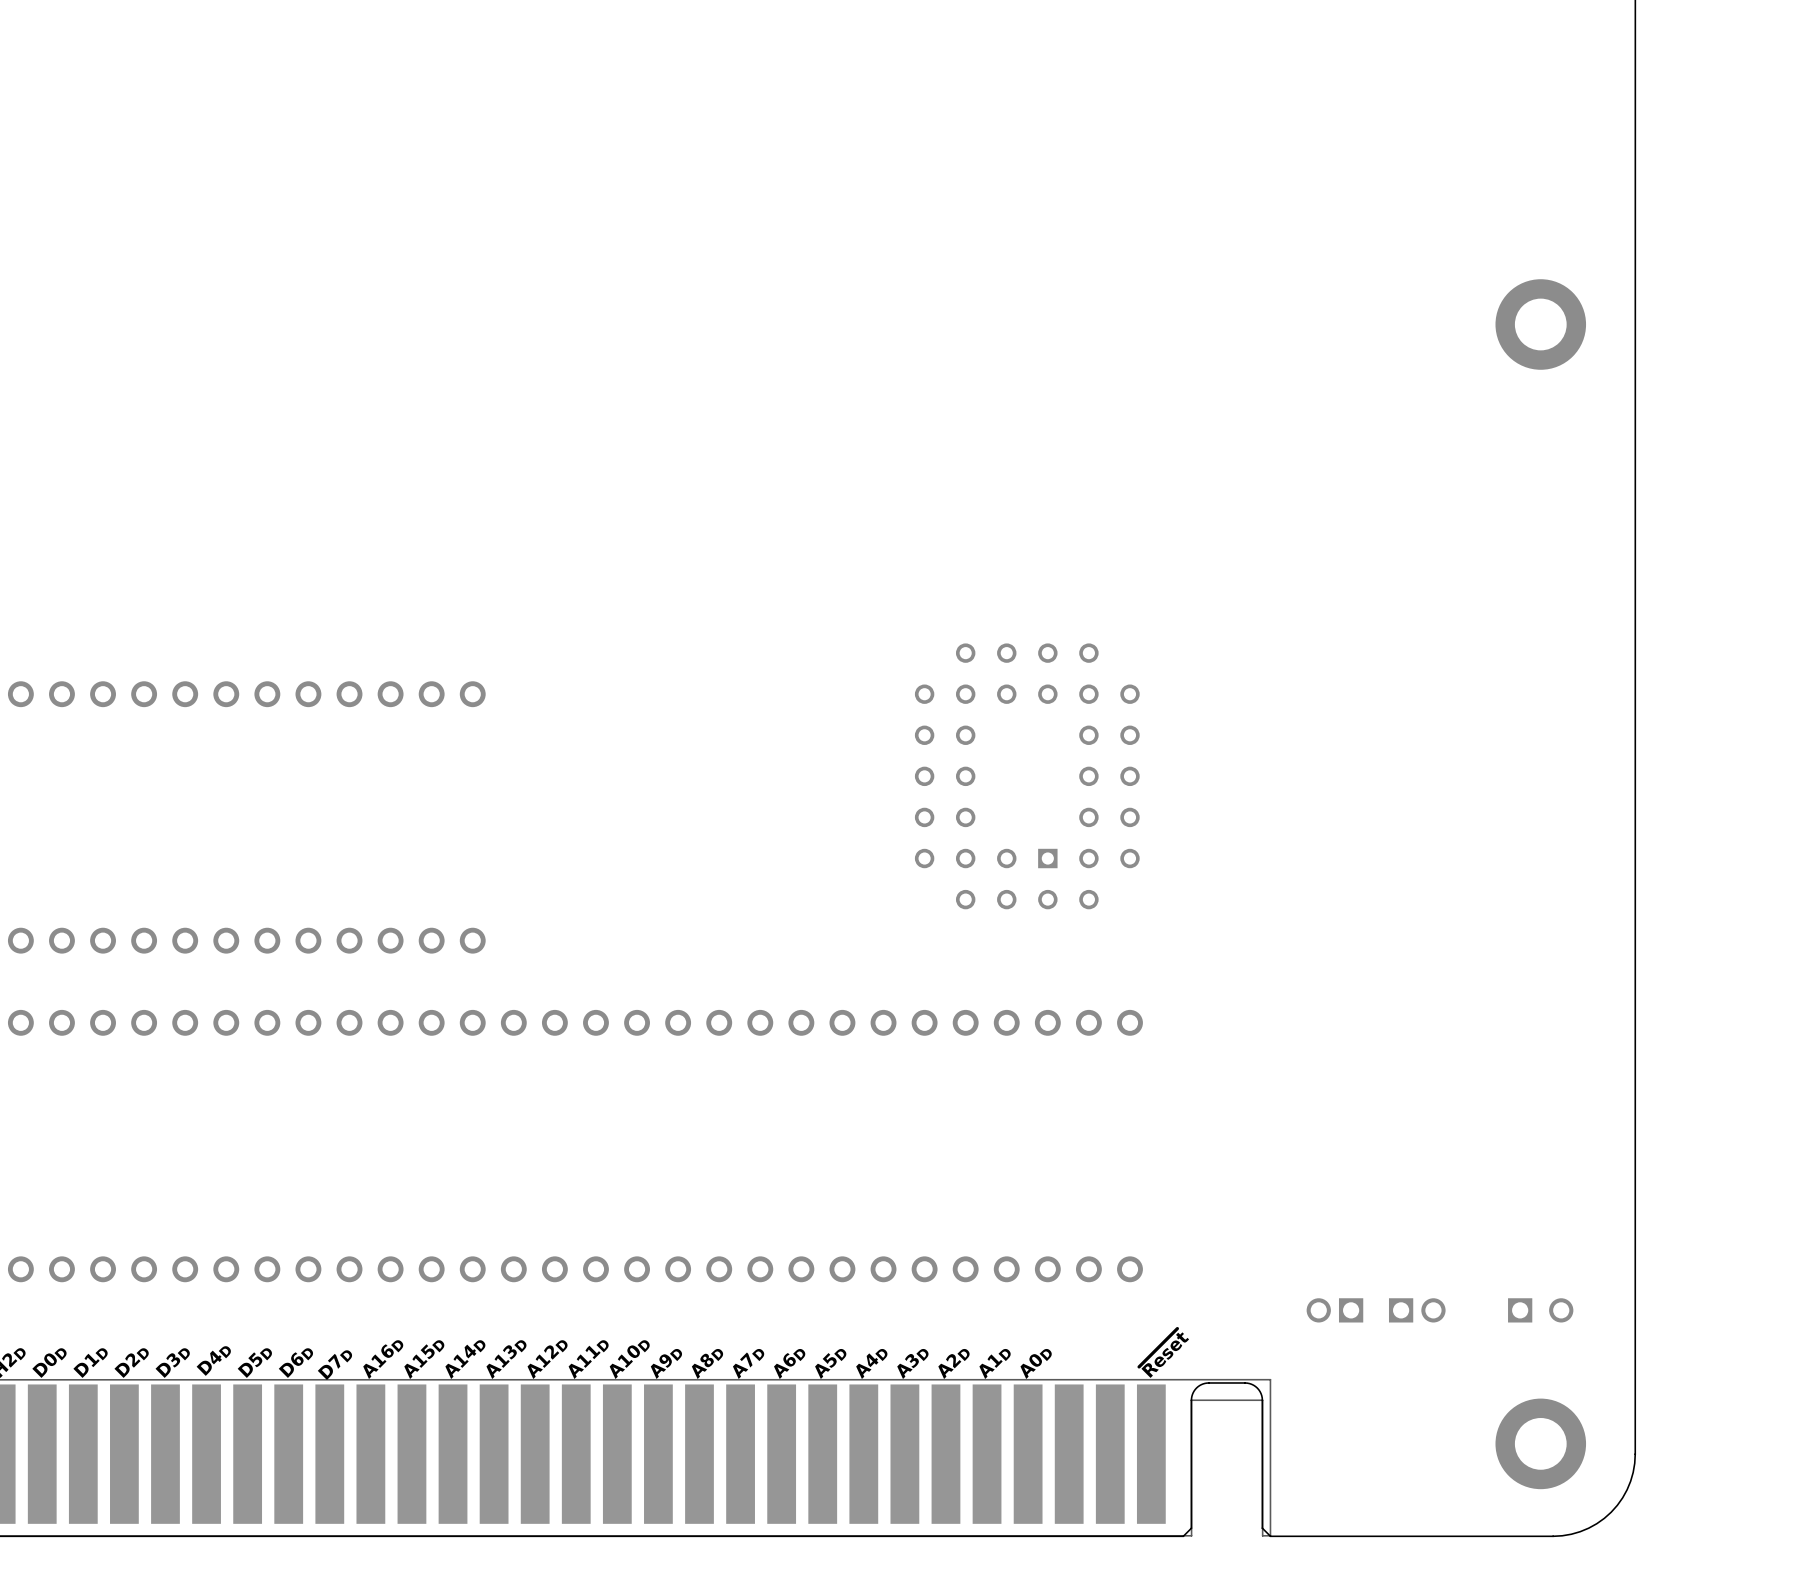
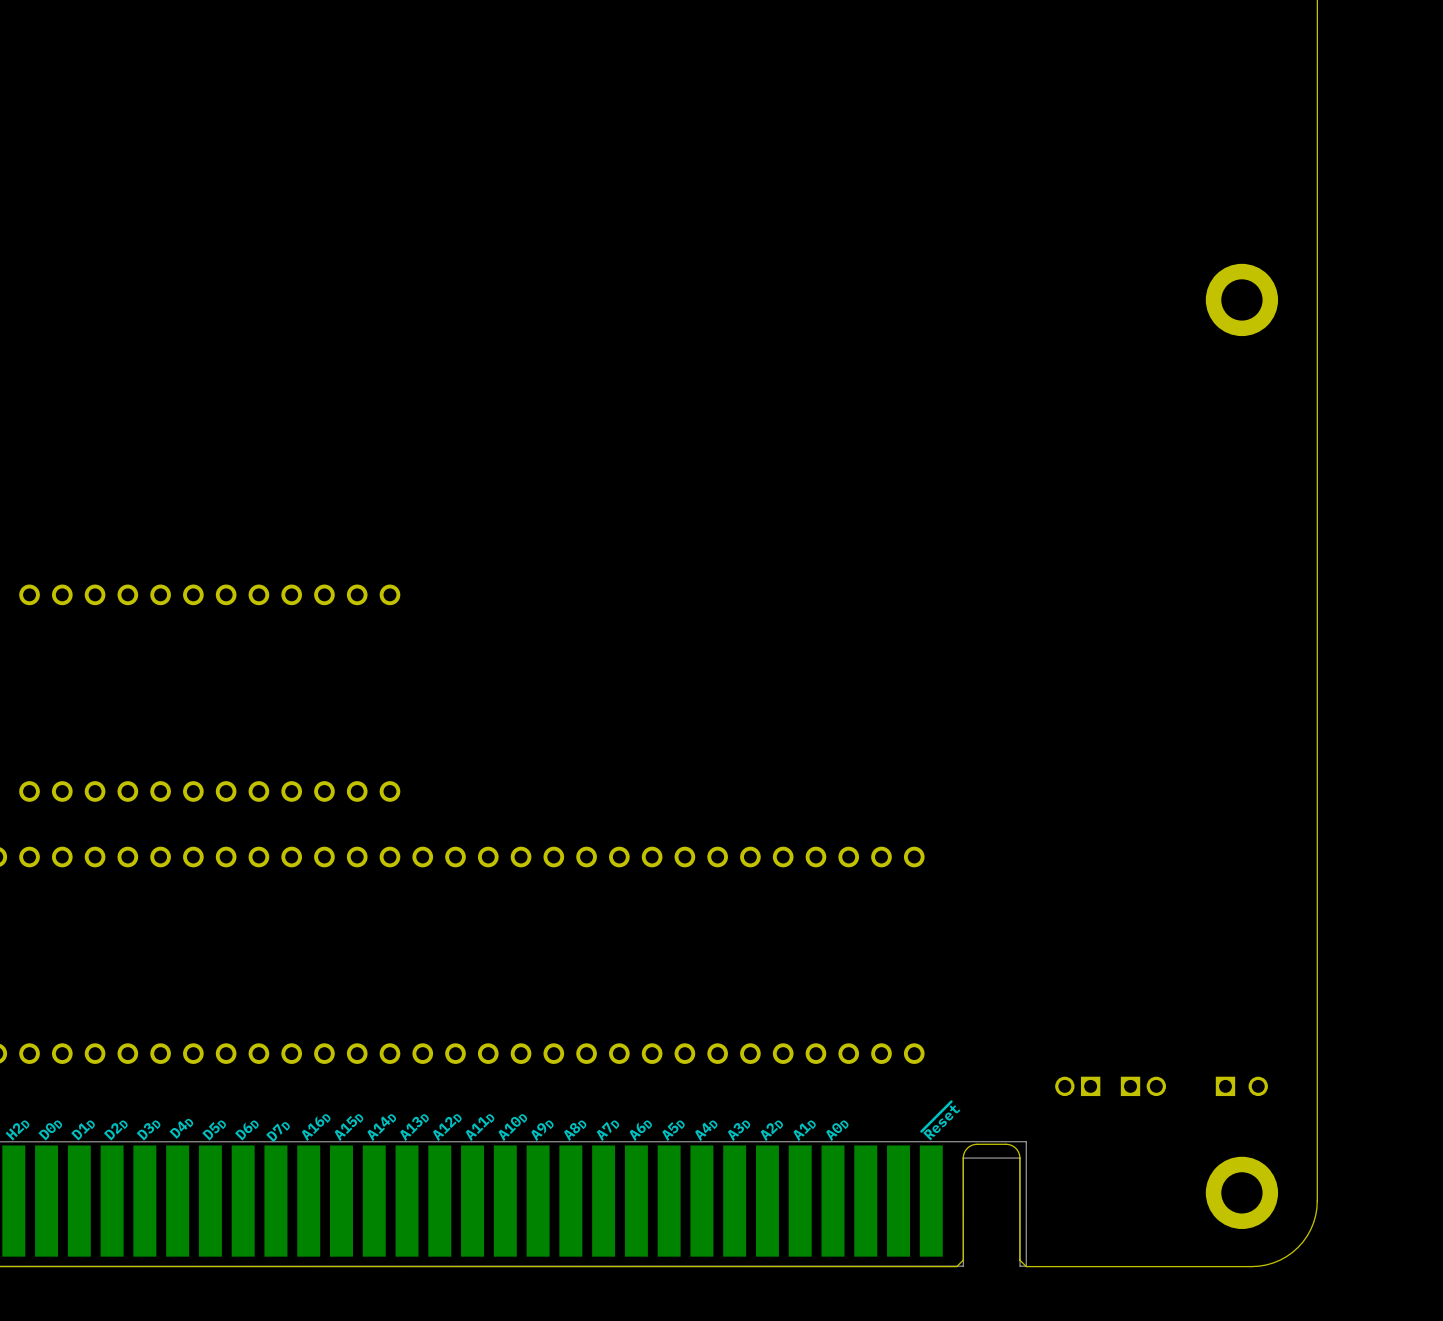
part: (1027, 776) -> none

